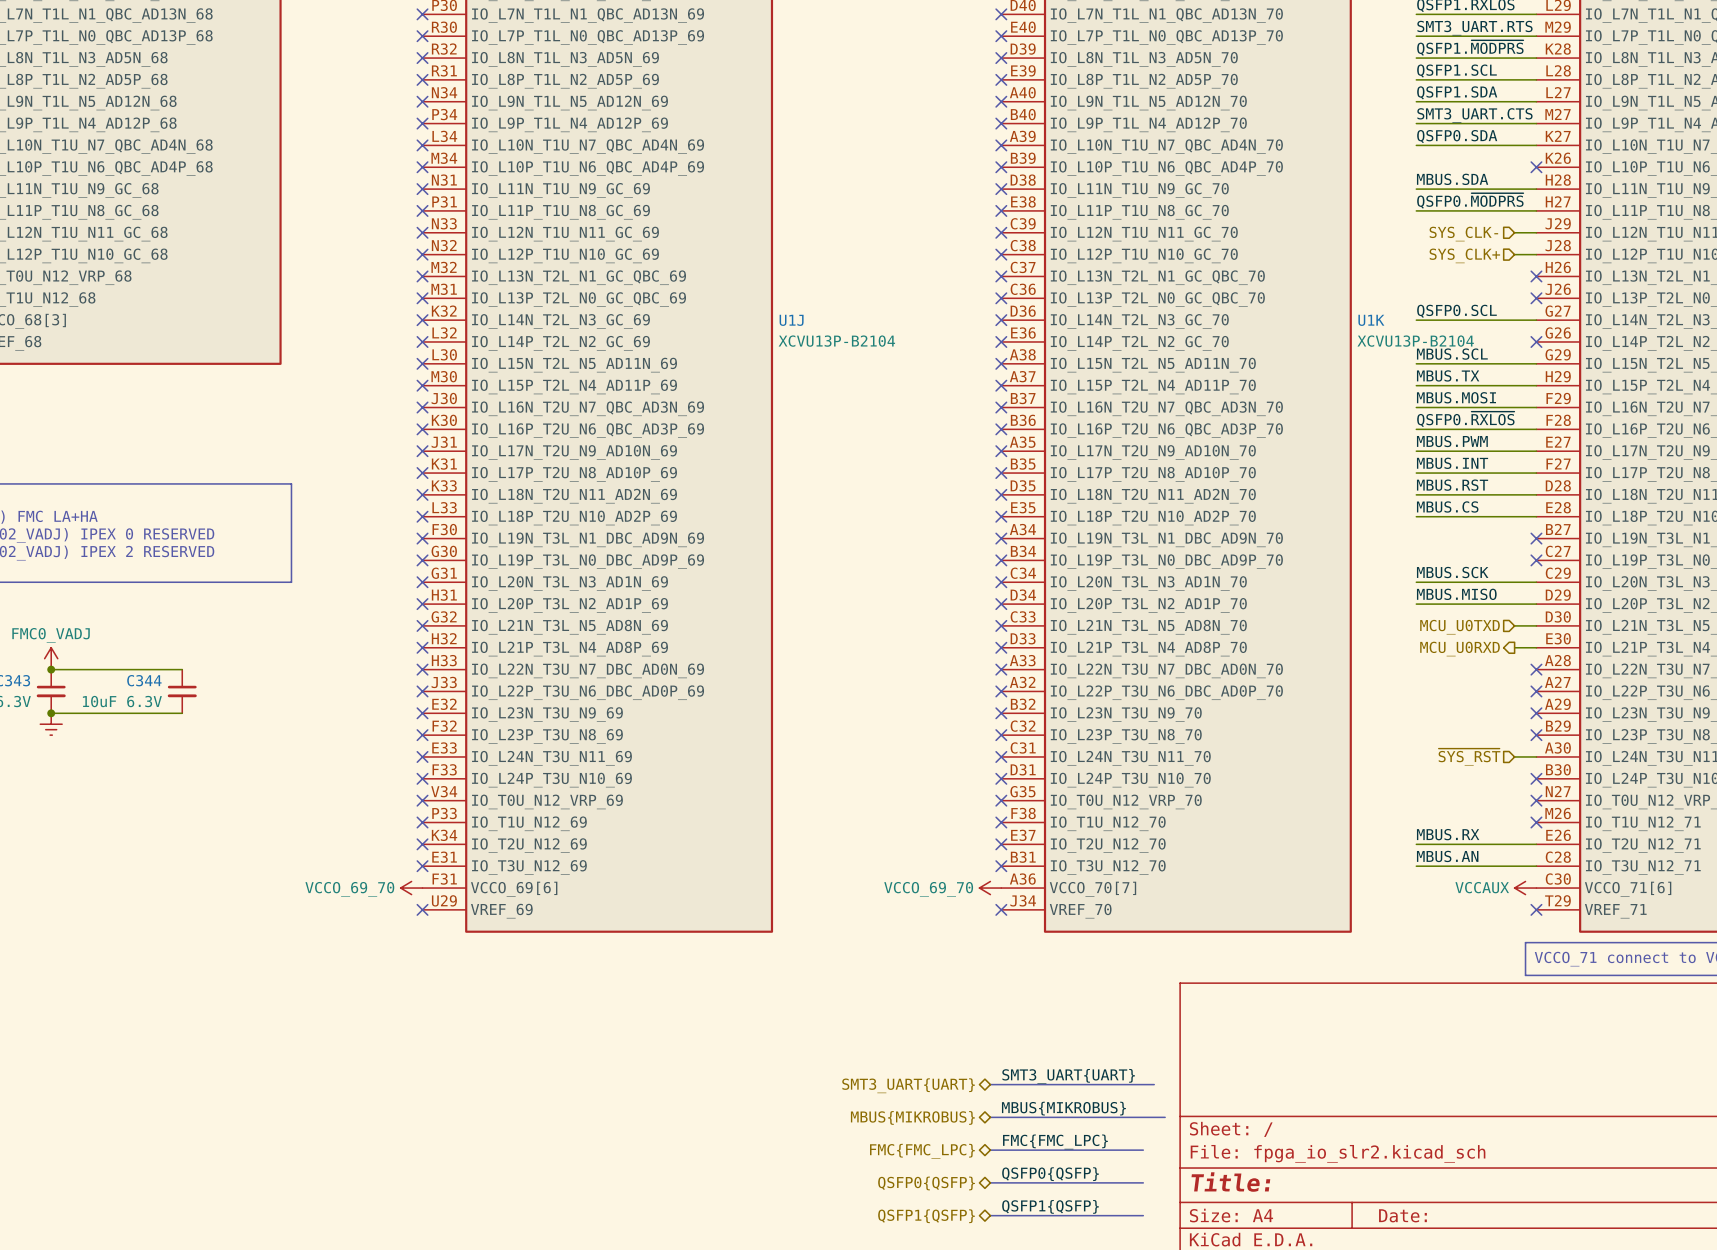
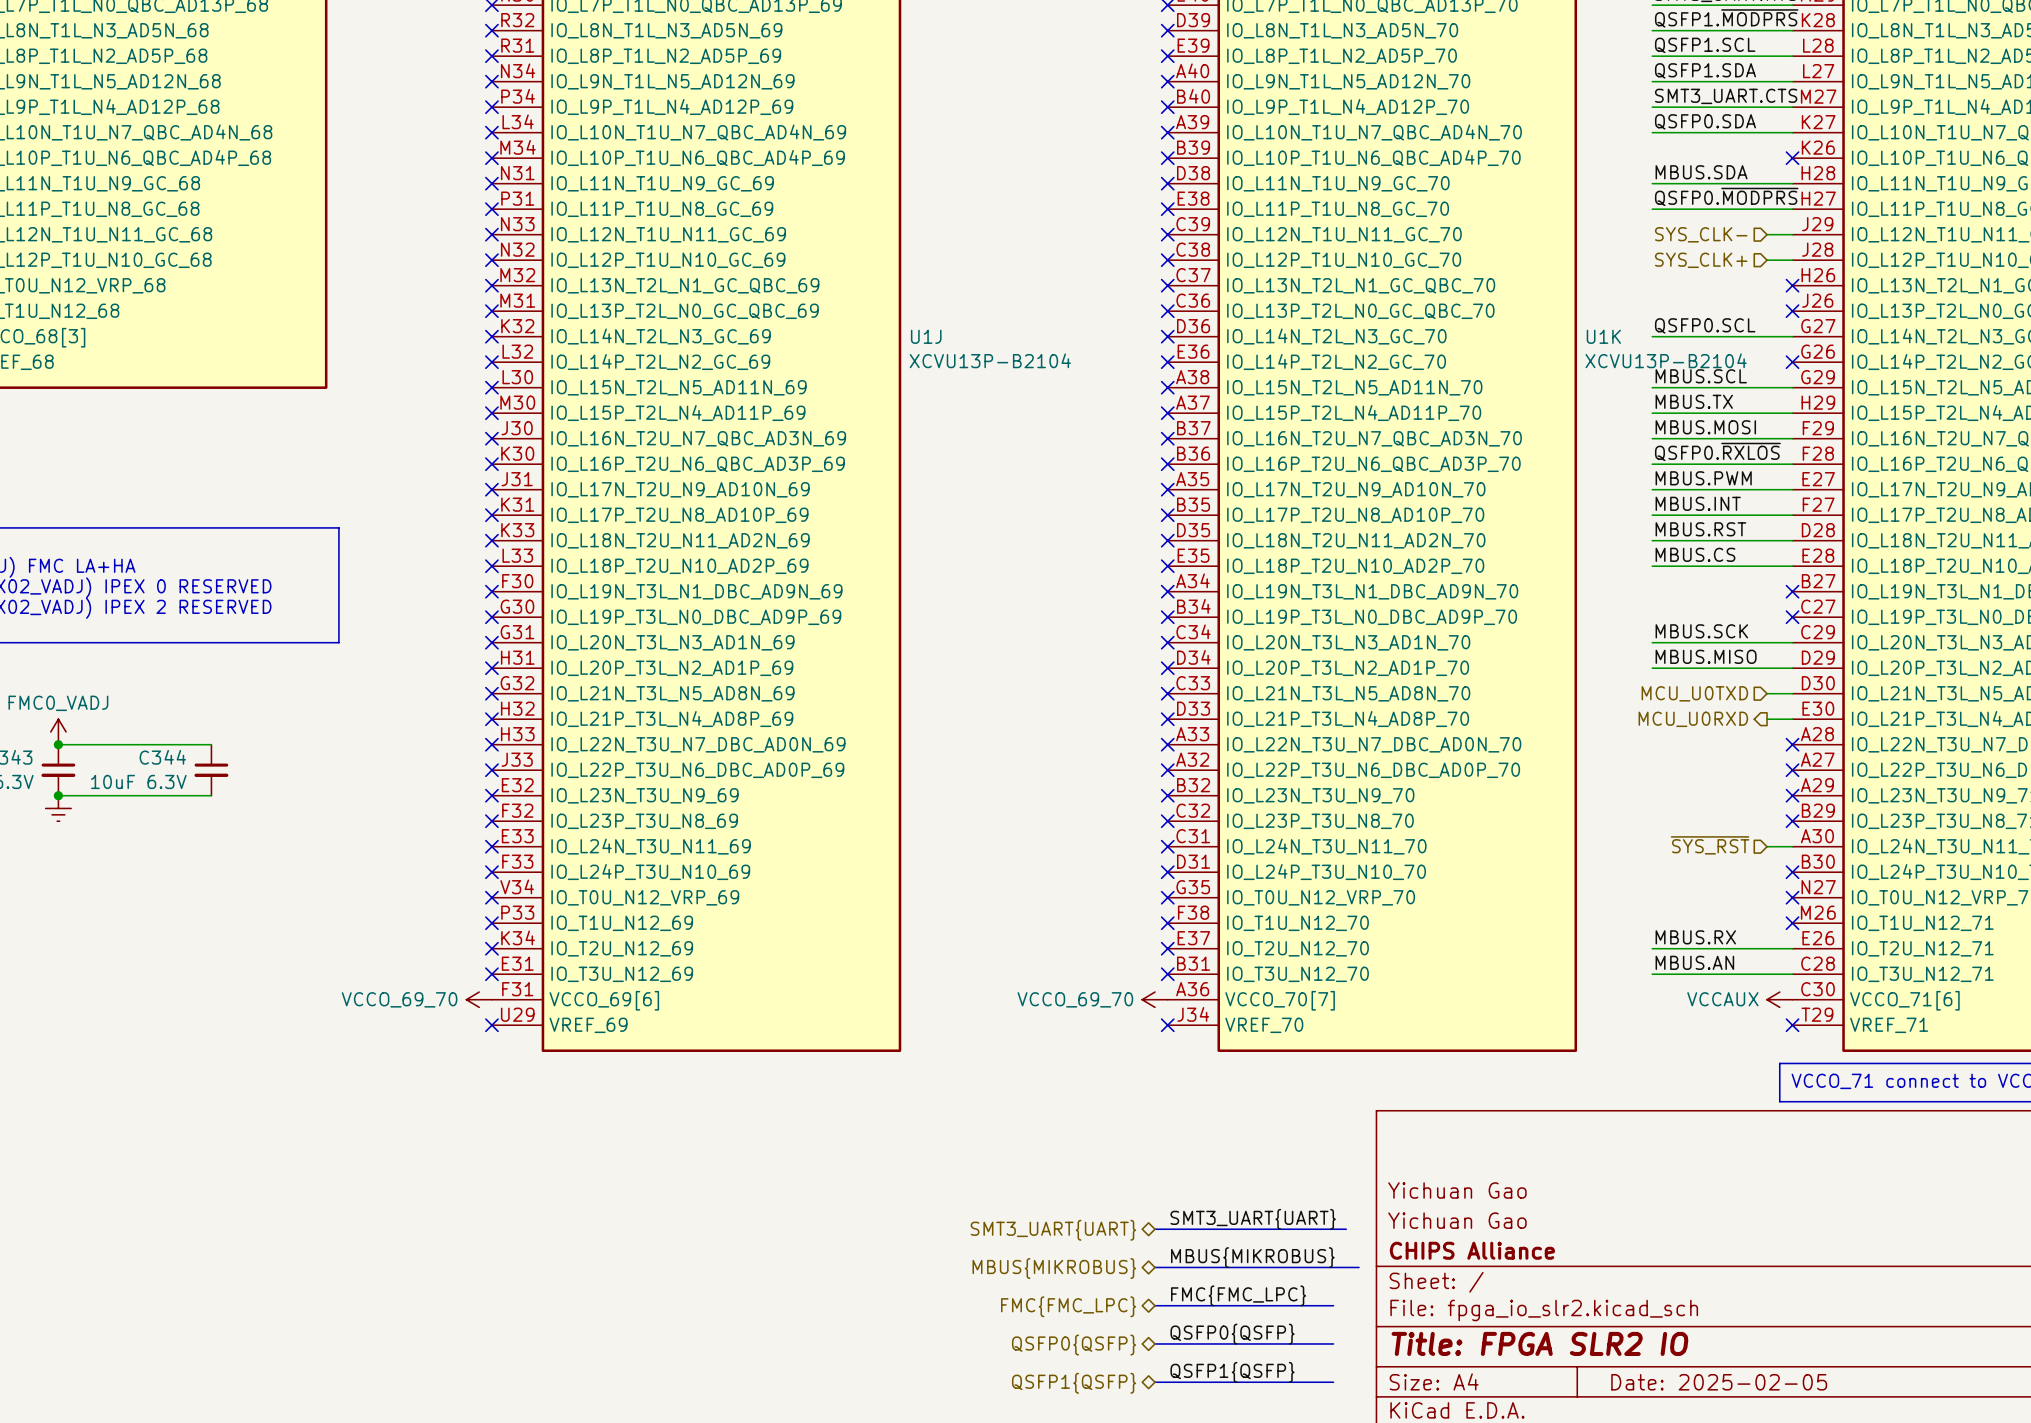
title block: none -> Yichuan Gao (1457, 1190)
title block: none -> Yichuan Gao (1457, 1220)
title block: none -> CHIPS Alliance (1472, 1250)
title block: Title: (1230, 1182) -> Title: FPGA SLR2 IO (1539, 1343)
title block: Date: (1402, 1215) -> Date: 2025-02-05 (1719, 1382)

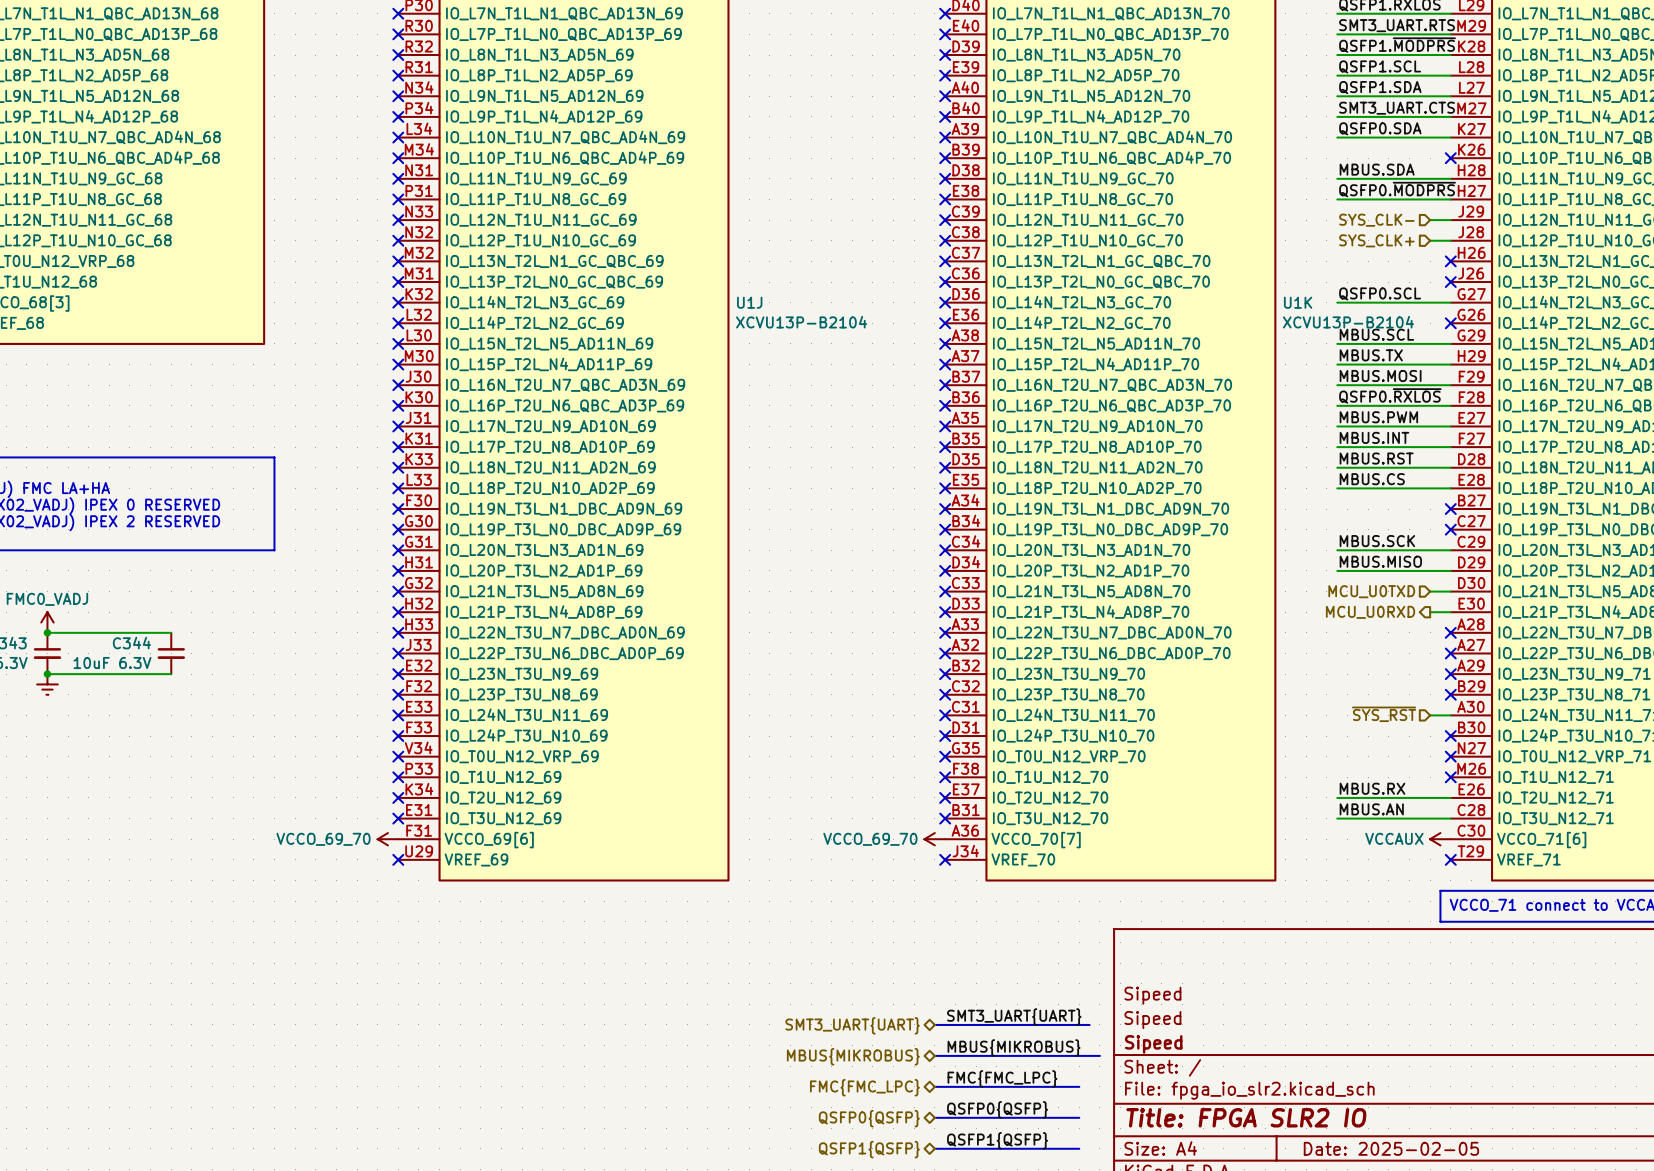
title block: Yichuan Gao (1457, 1190) -> Sipeed (1152, 995)
title block: Yichuan Gao (1457, 1220) -> Sipeed (1152, 1020)
title block: CHIPS Alliance (1472, 1250) -> Sipeed (1153, 1044)

